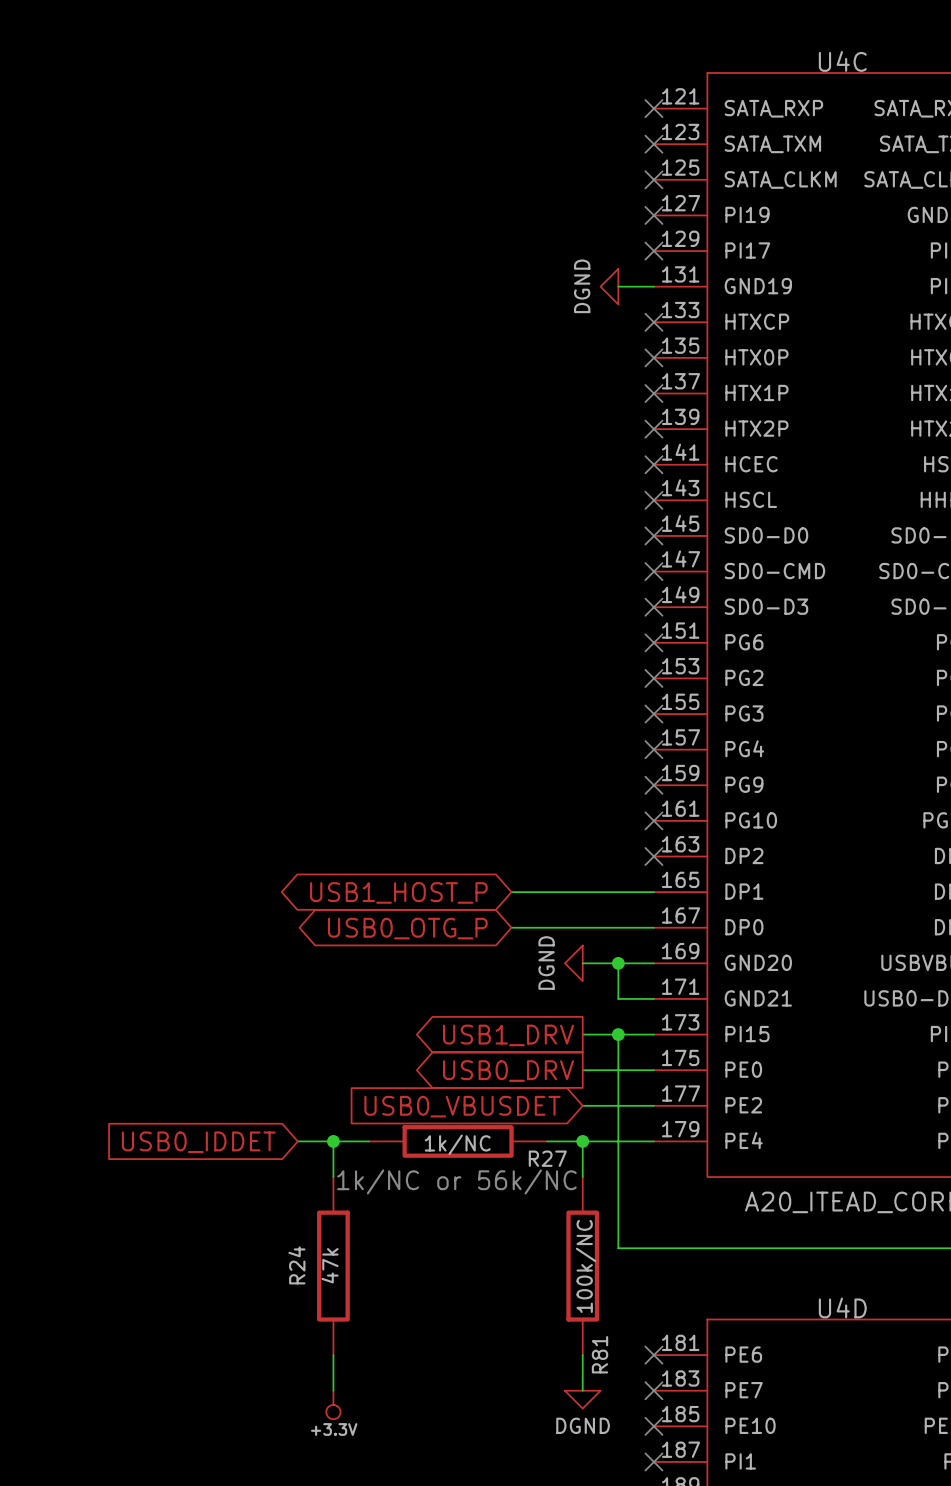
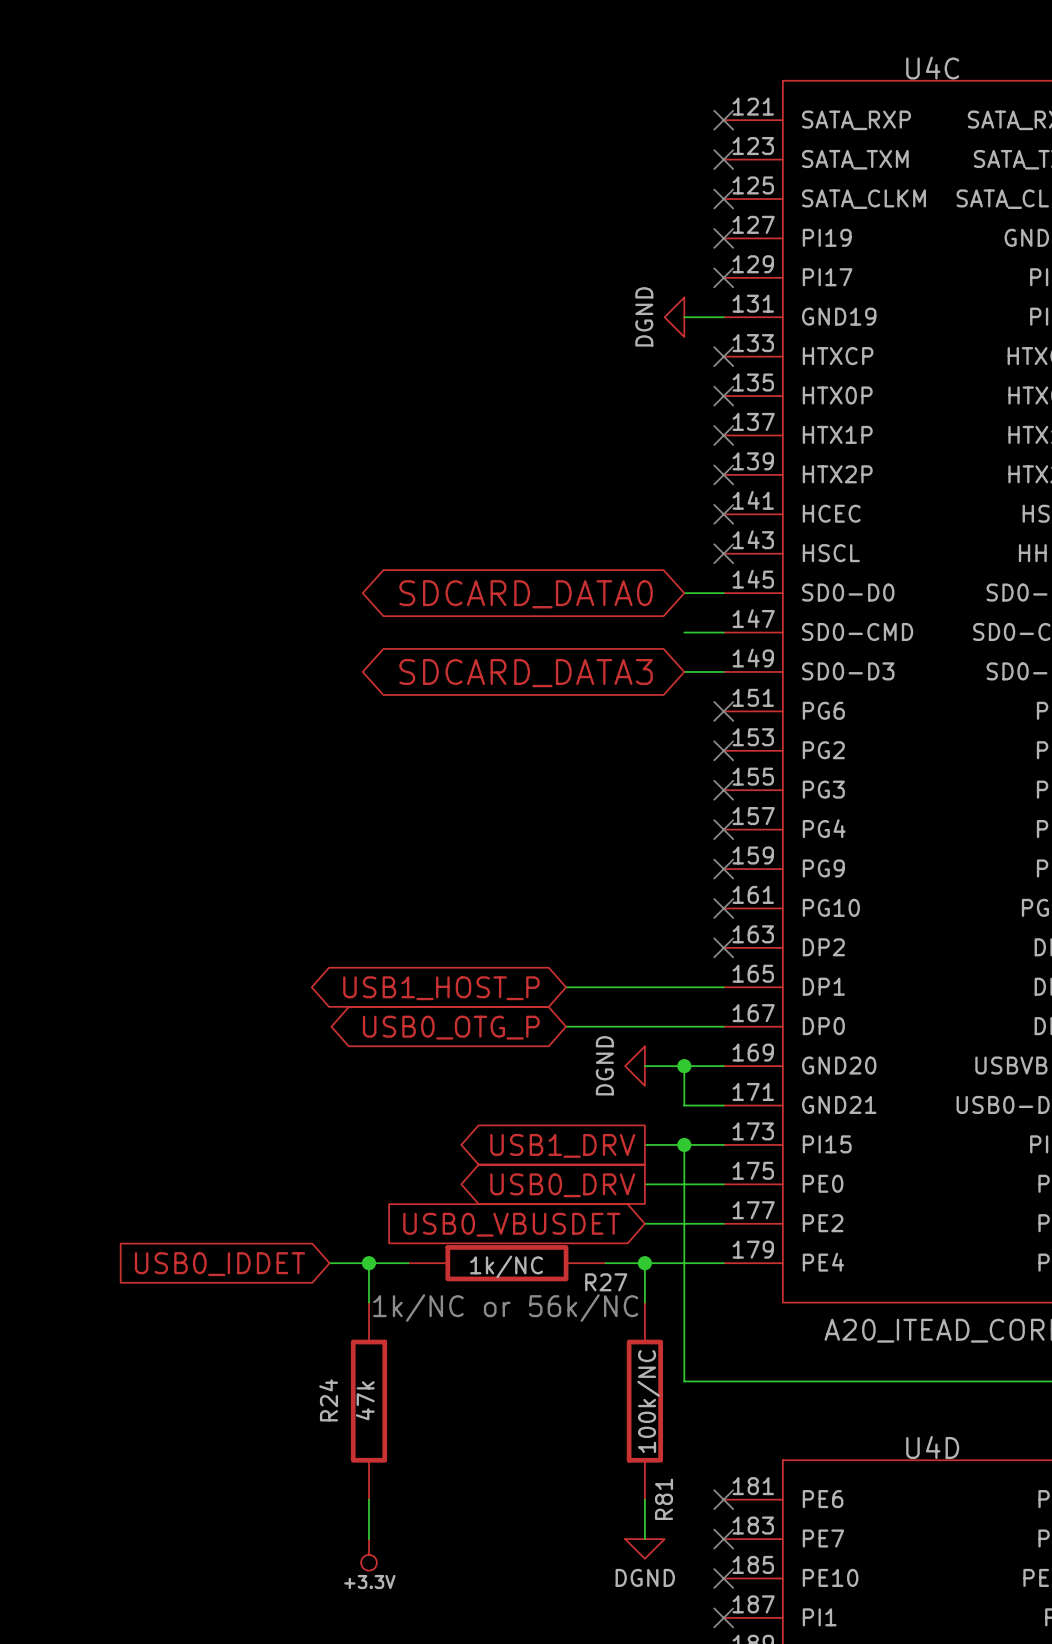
wire: none -> (684, 593) (723, 593)
no-connect mark: (653, 535) -> none
global label: none -> SDCARD_DATA0 (526, 594)
wire: none -> (684, 632) (723, 632)
no-connect mark: (653, 571) -> none
wire: none -> (684, 671) (723, 671)
no-connect mark: (653, 607) -> none
global label: none -> SDCARD_DATA3 (526, 673)

